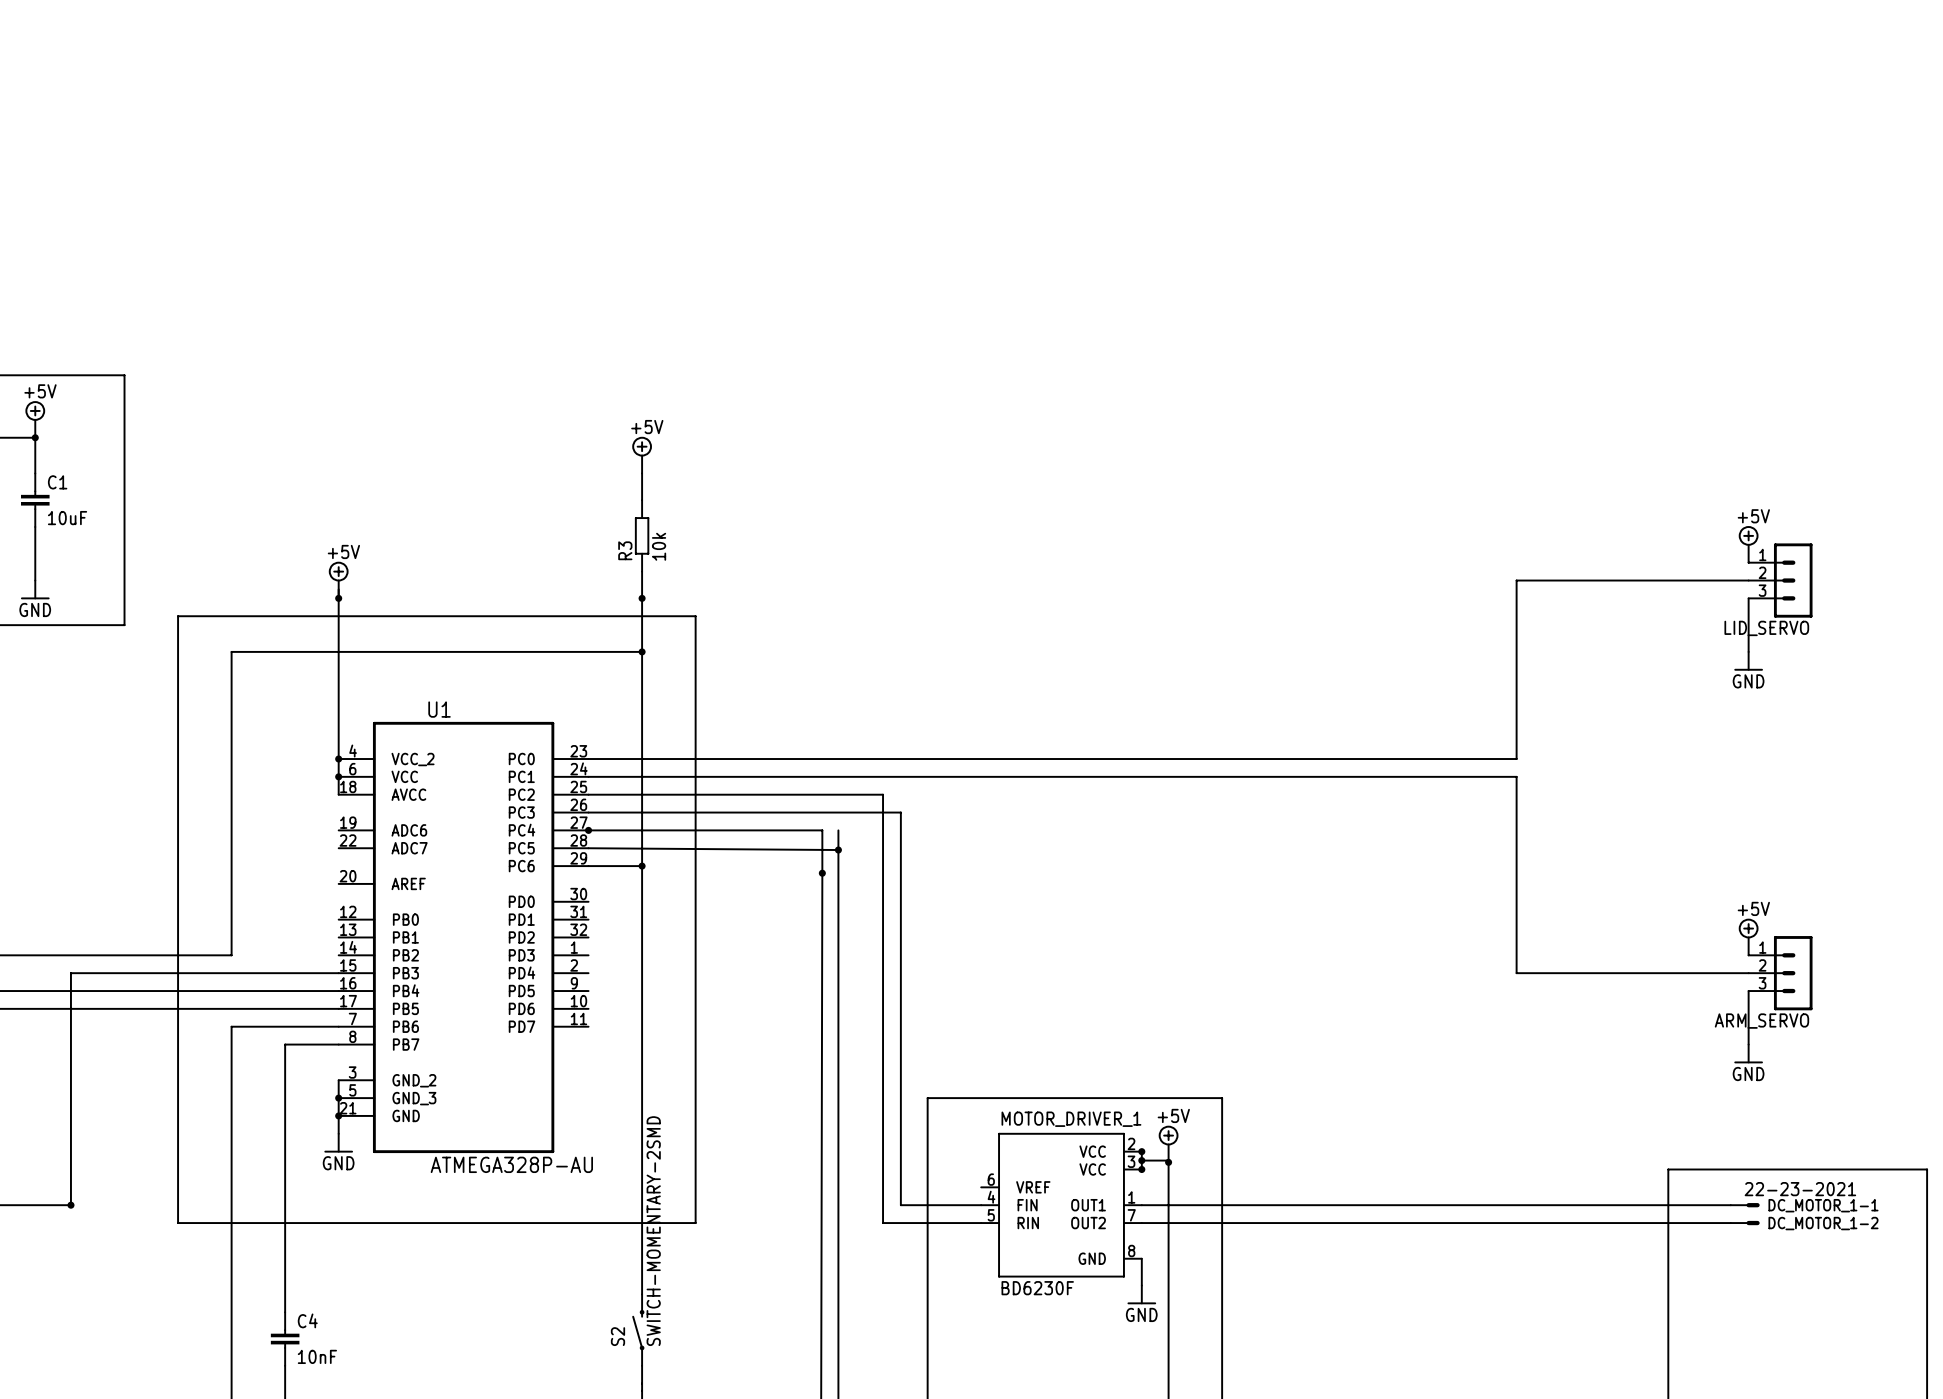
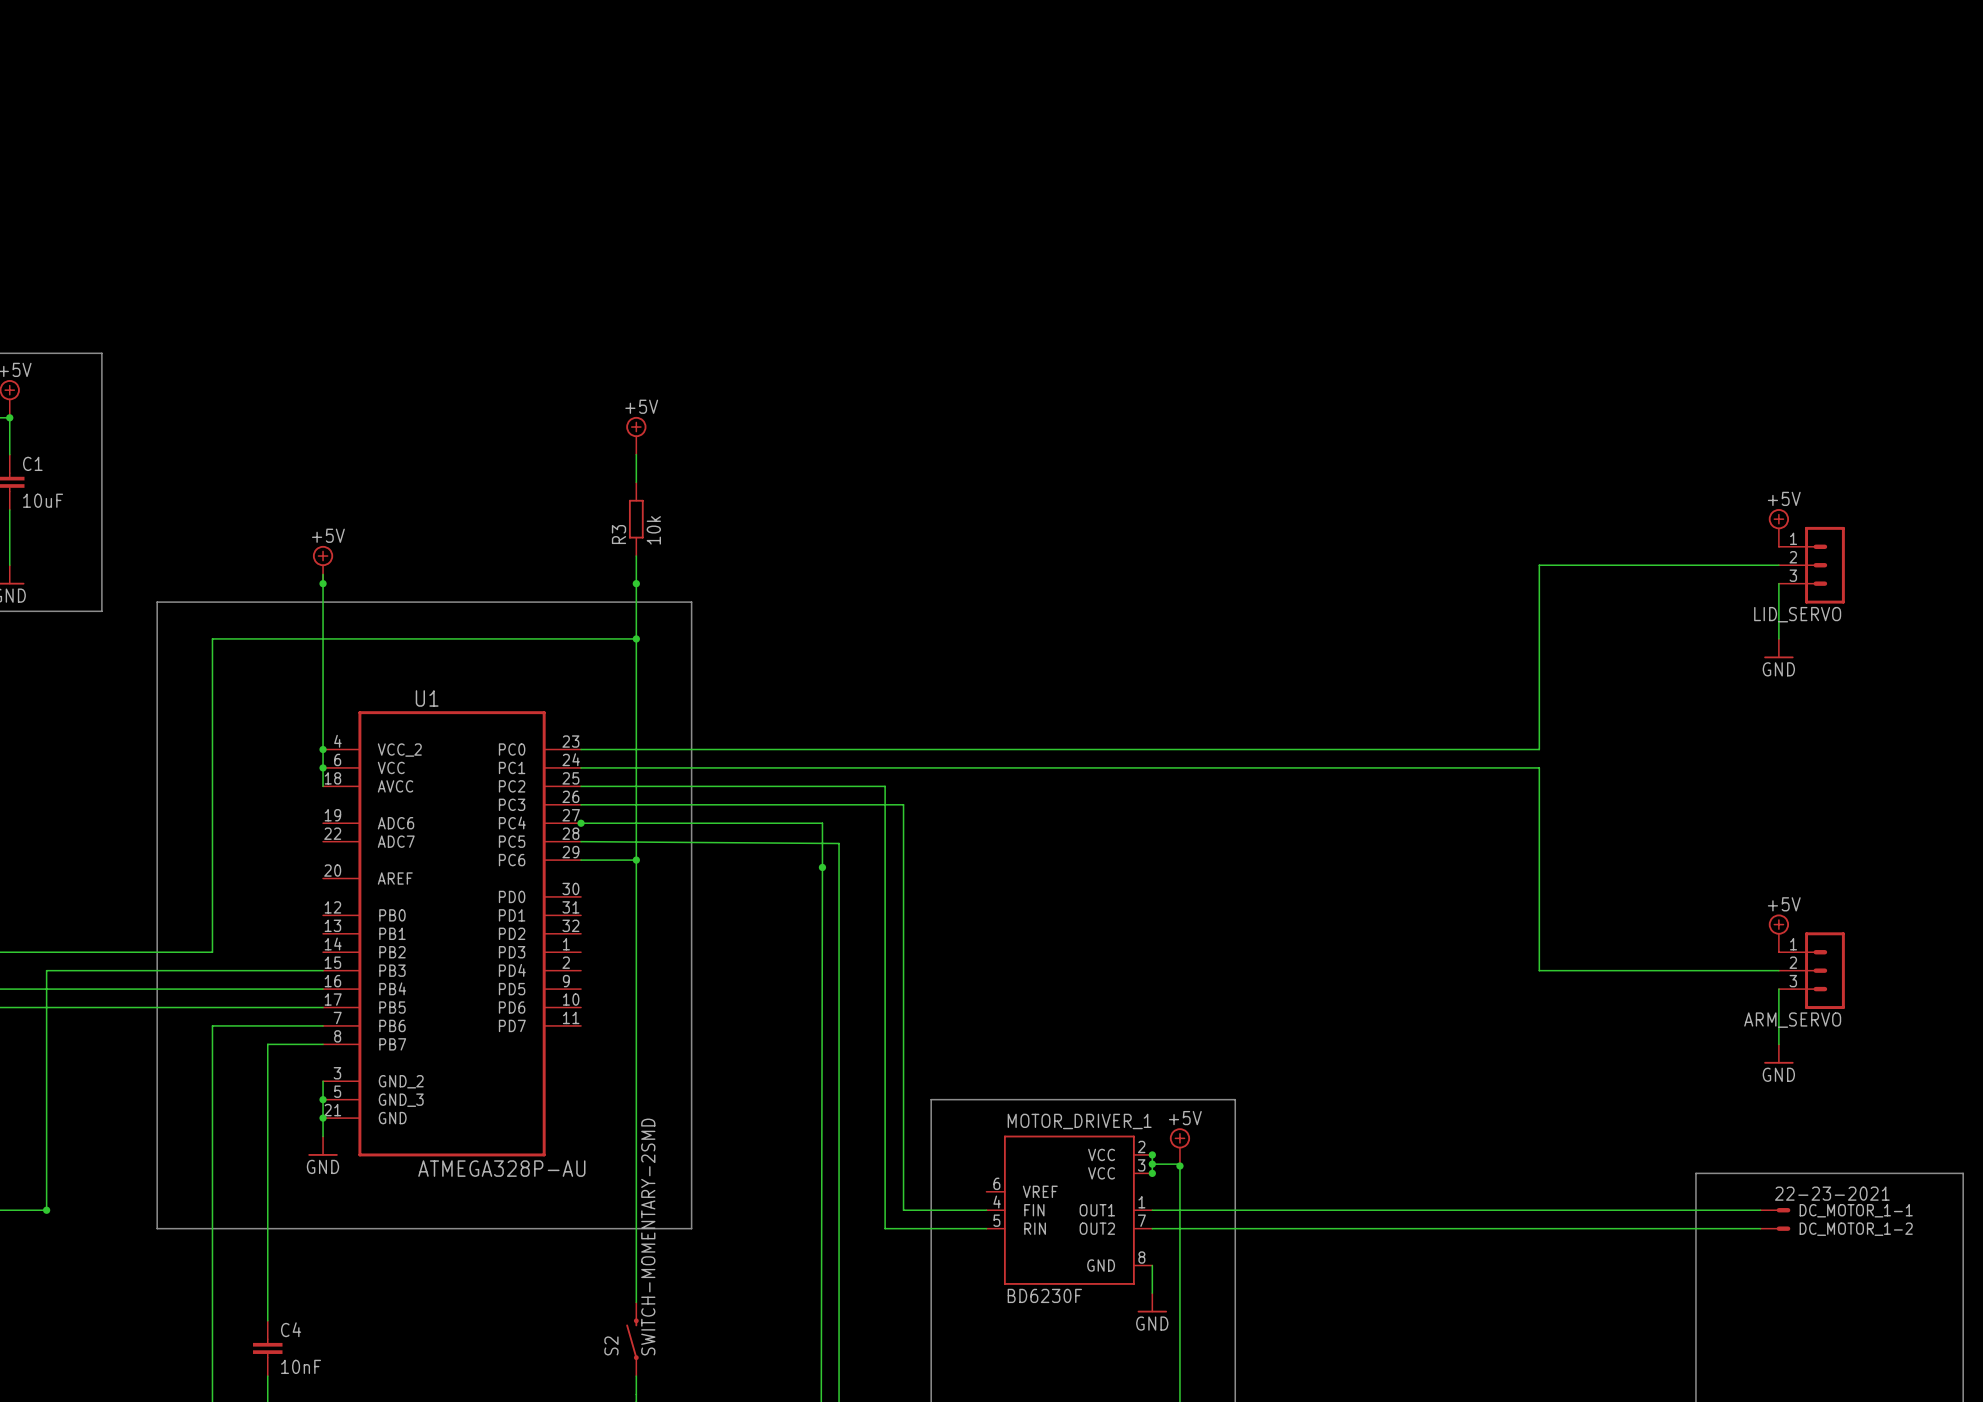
wire: (838, 830) (838, 850) -> none
junction: (838, 850) -> none

